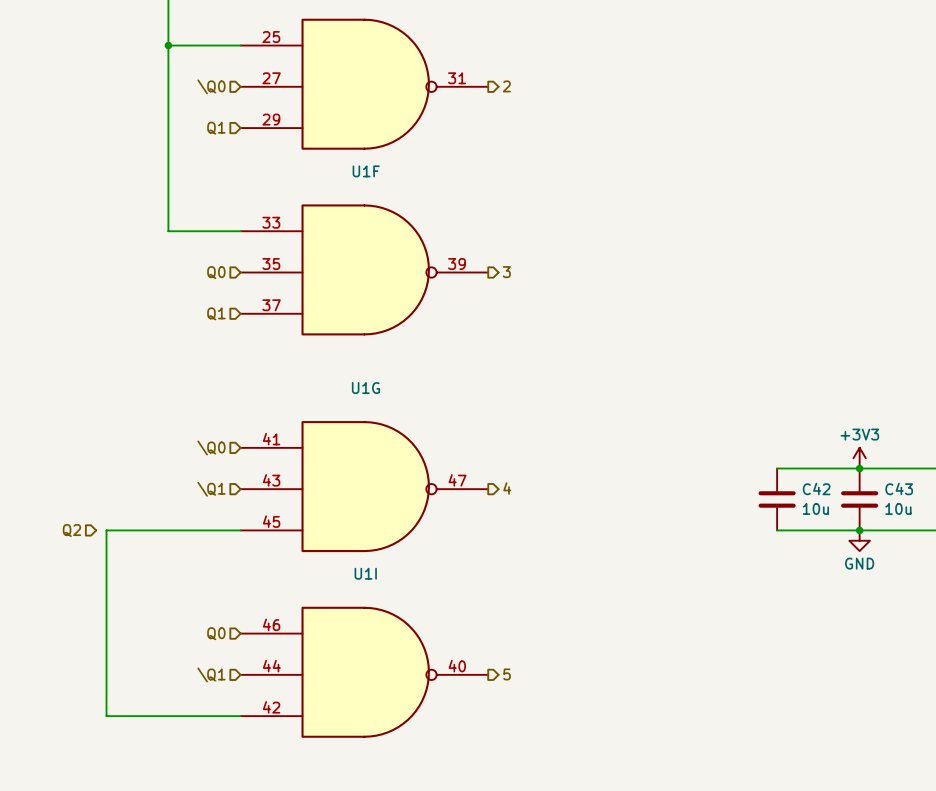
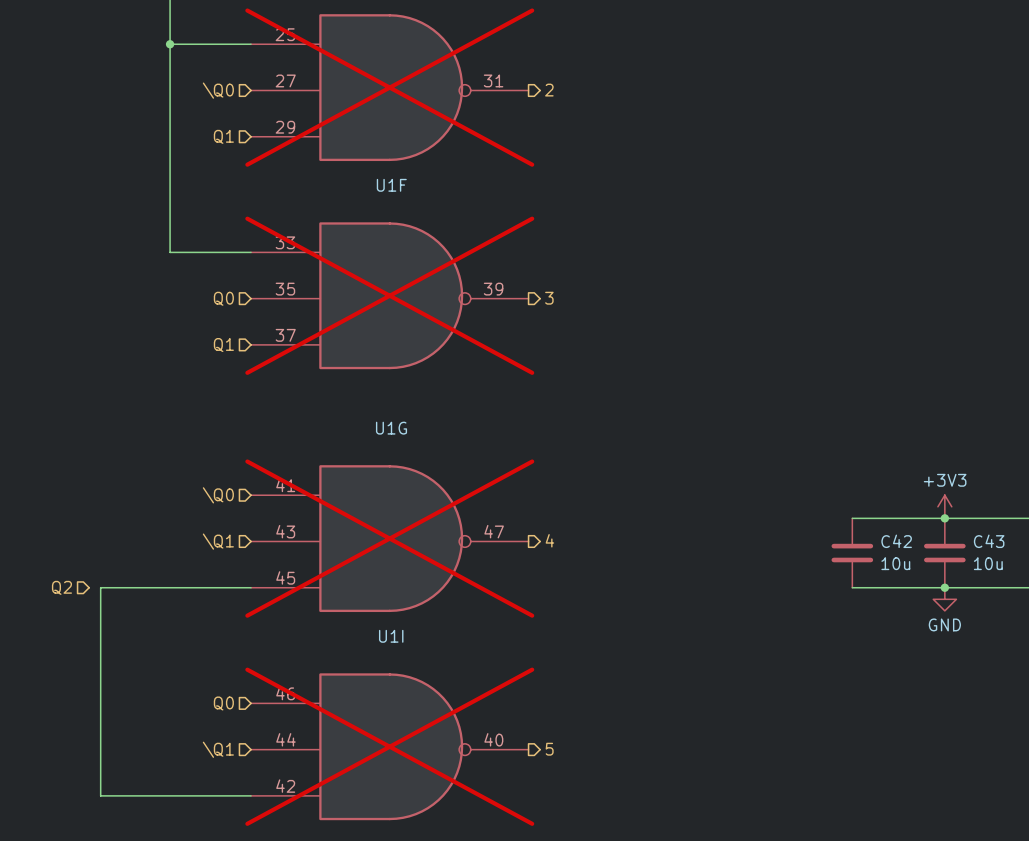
part do-not-place cross: none -> (389, 87)
U1F do-not-place cross: none -> (389, 295)
U1G do-not-place cross: none -> (389, 538)
U1I do-not-place cross: none -> (389, 746)

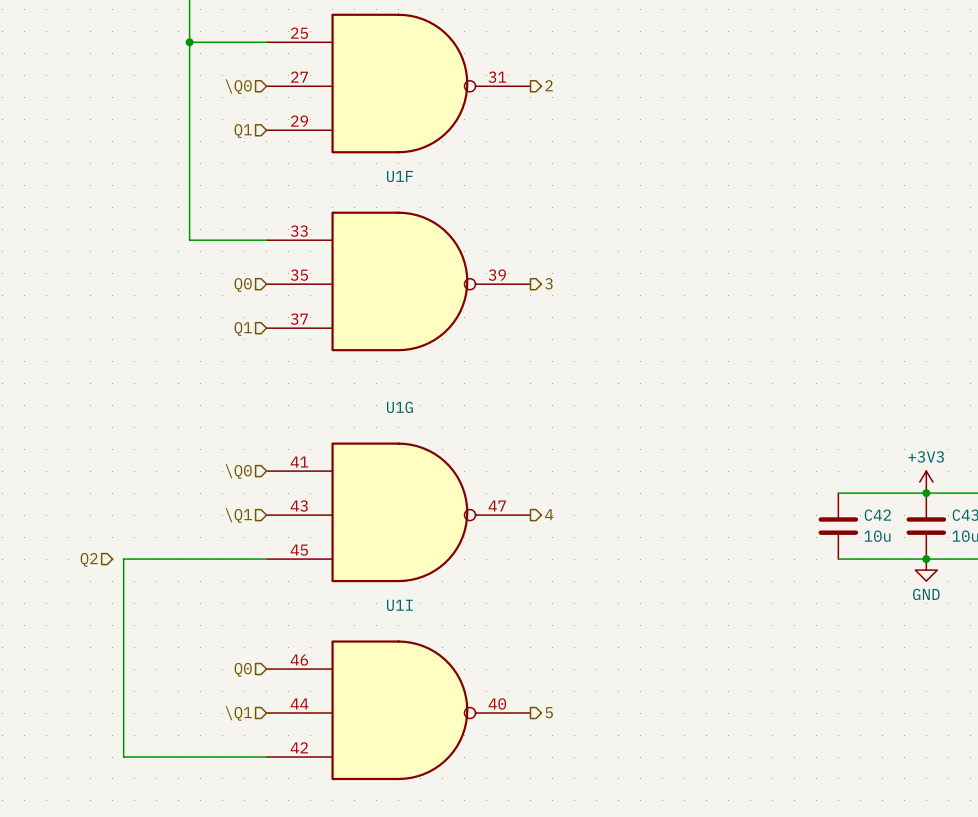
part do-not-place cross: (389, 87) -> none
U1F do-not-place cross: (389, 295) -> none
U1G do-not-place cross: (389, 538) -> none
U1I do-not-place cross: (389, 746) -> none

